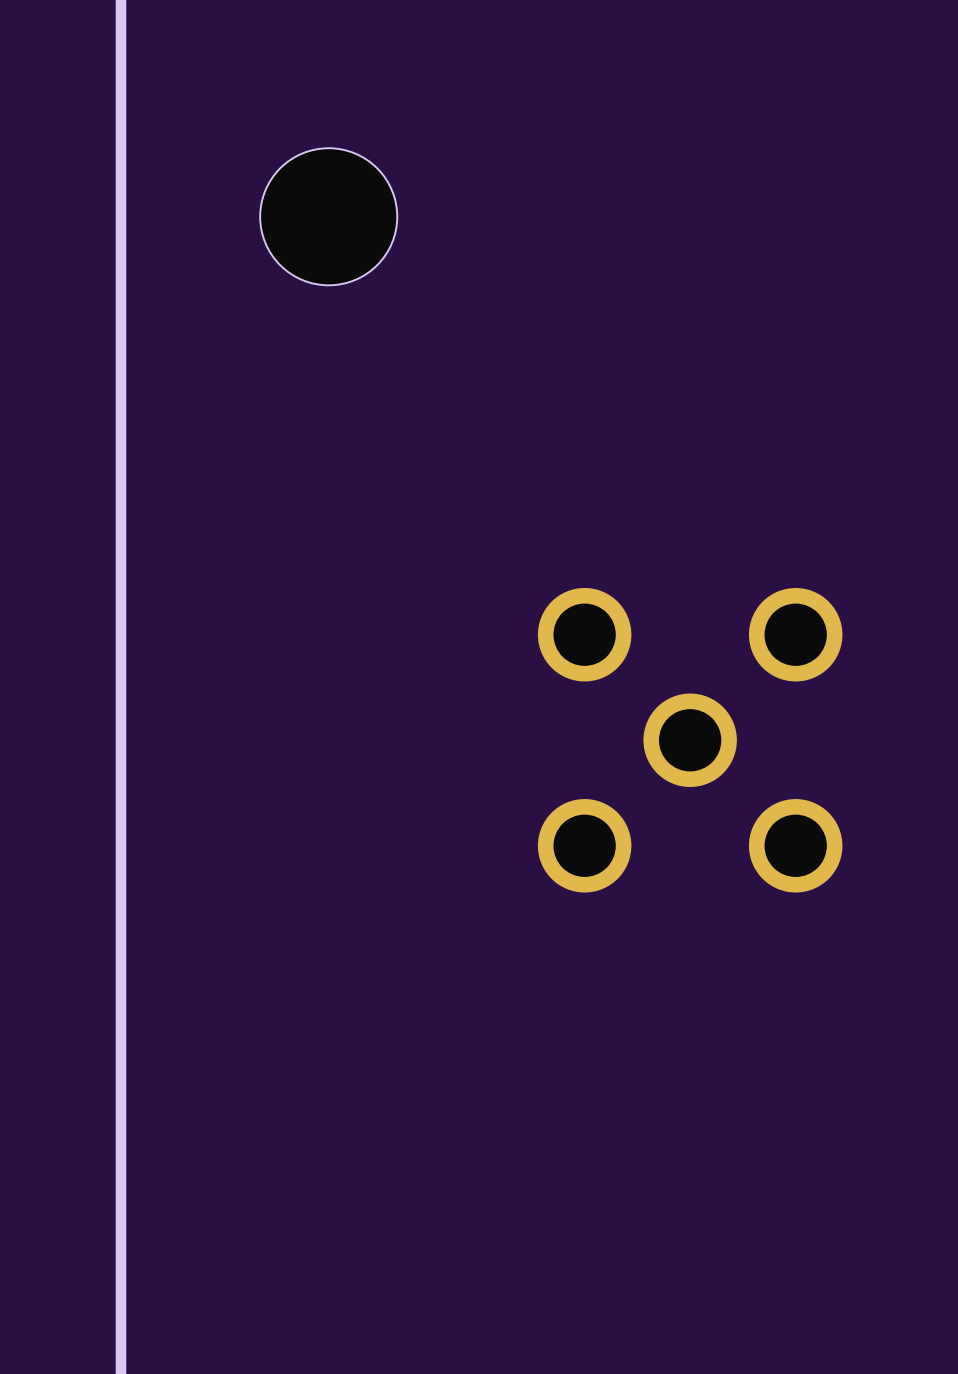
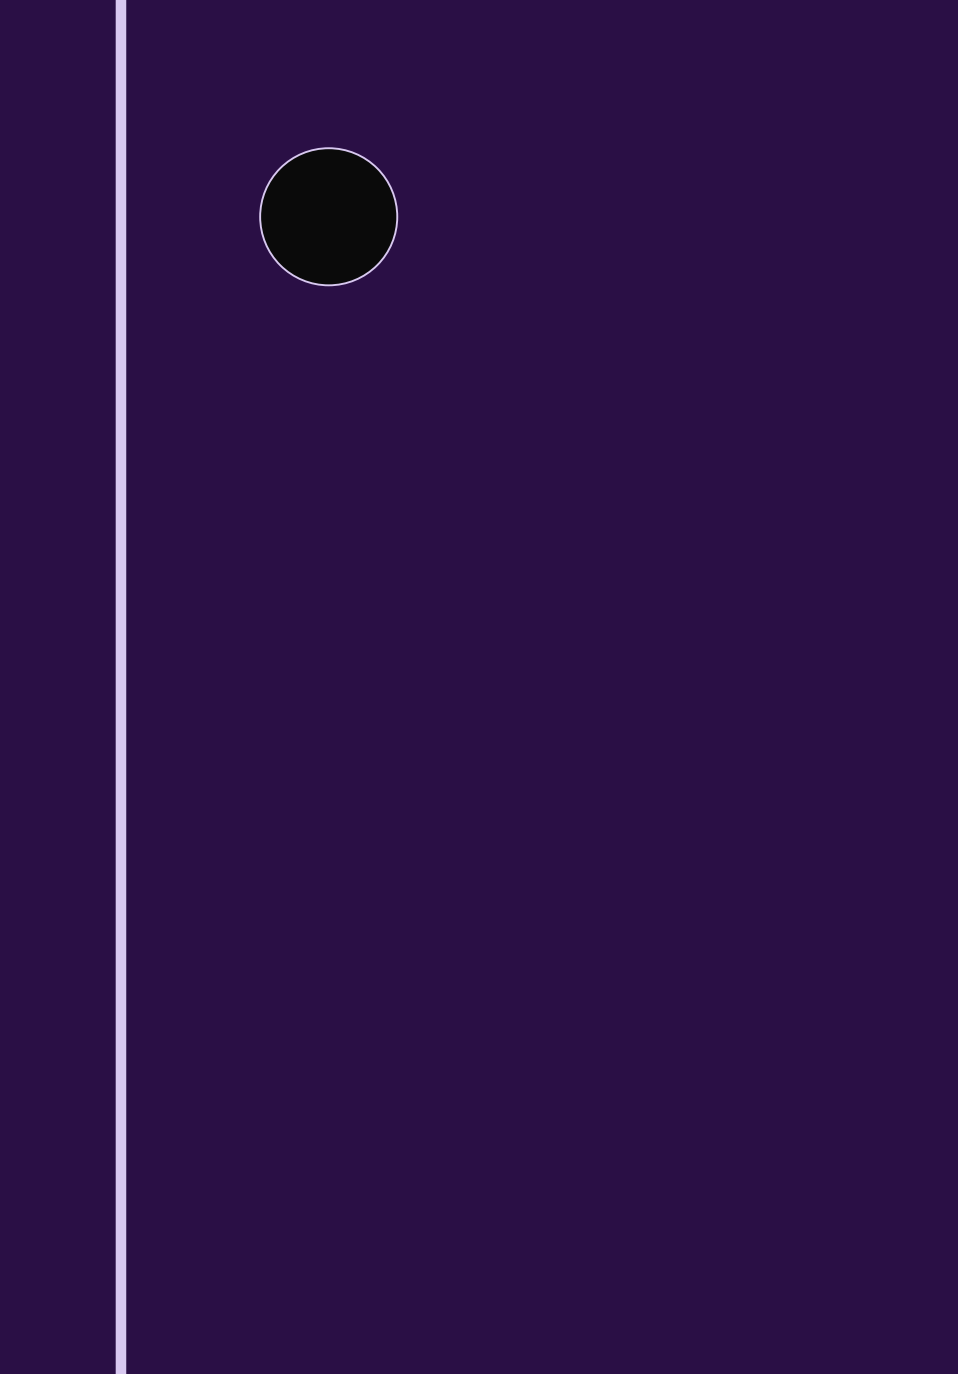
part: (690, 740) -> none

